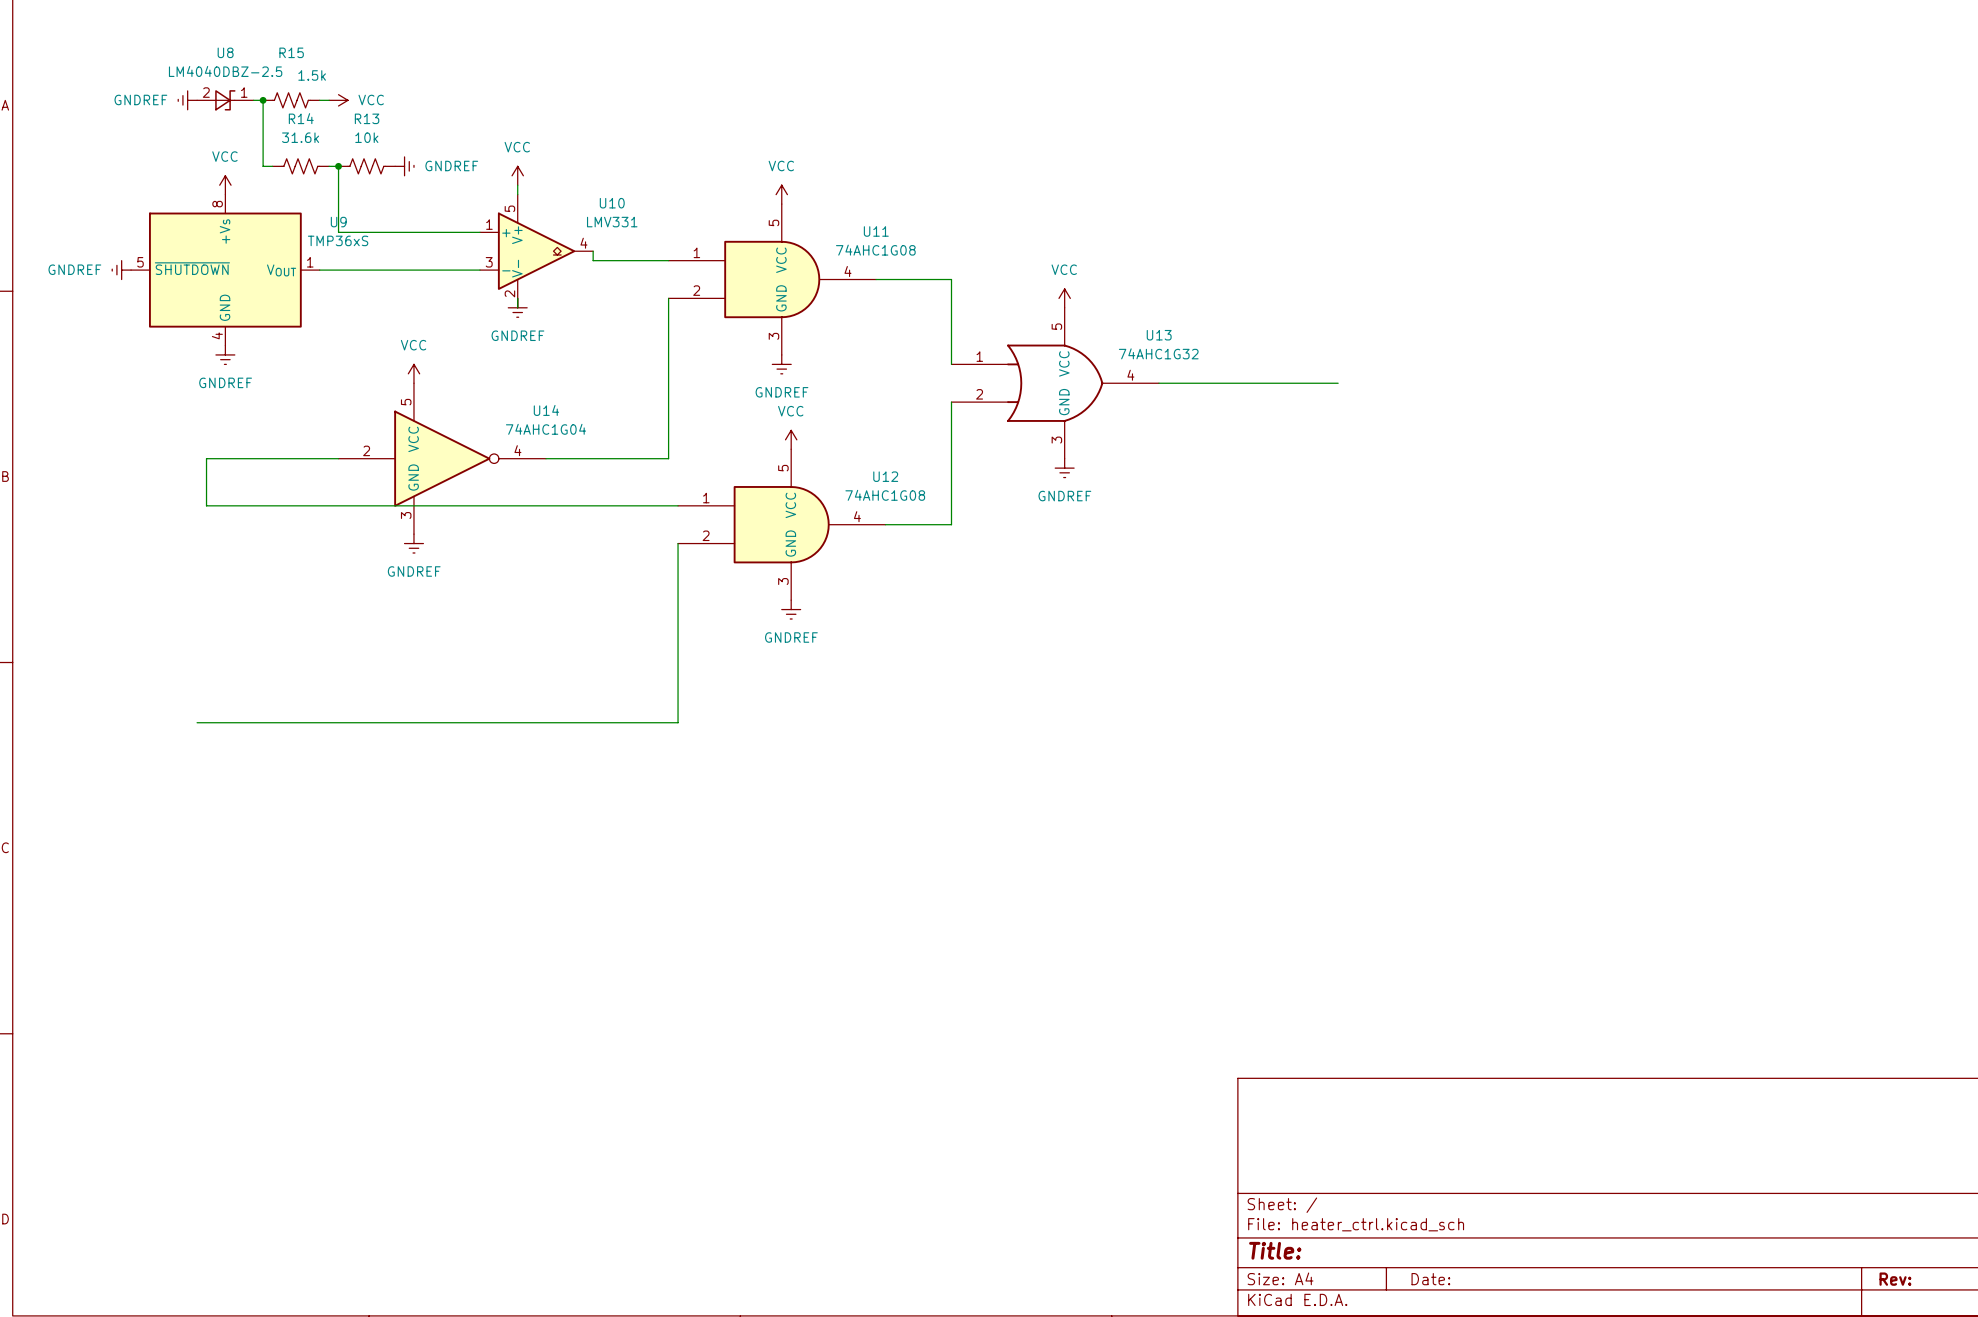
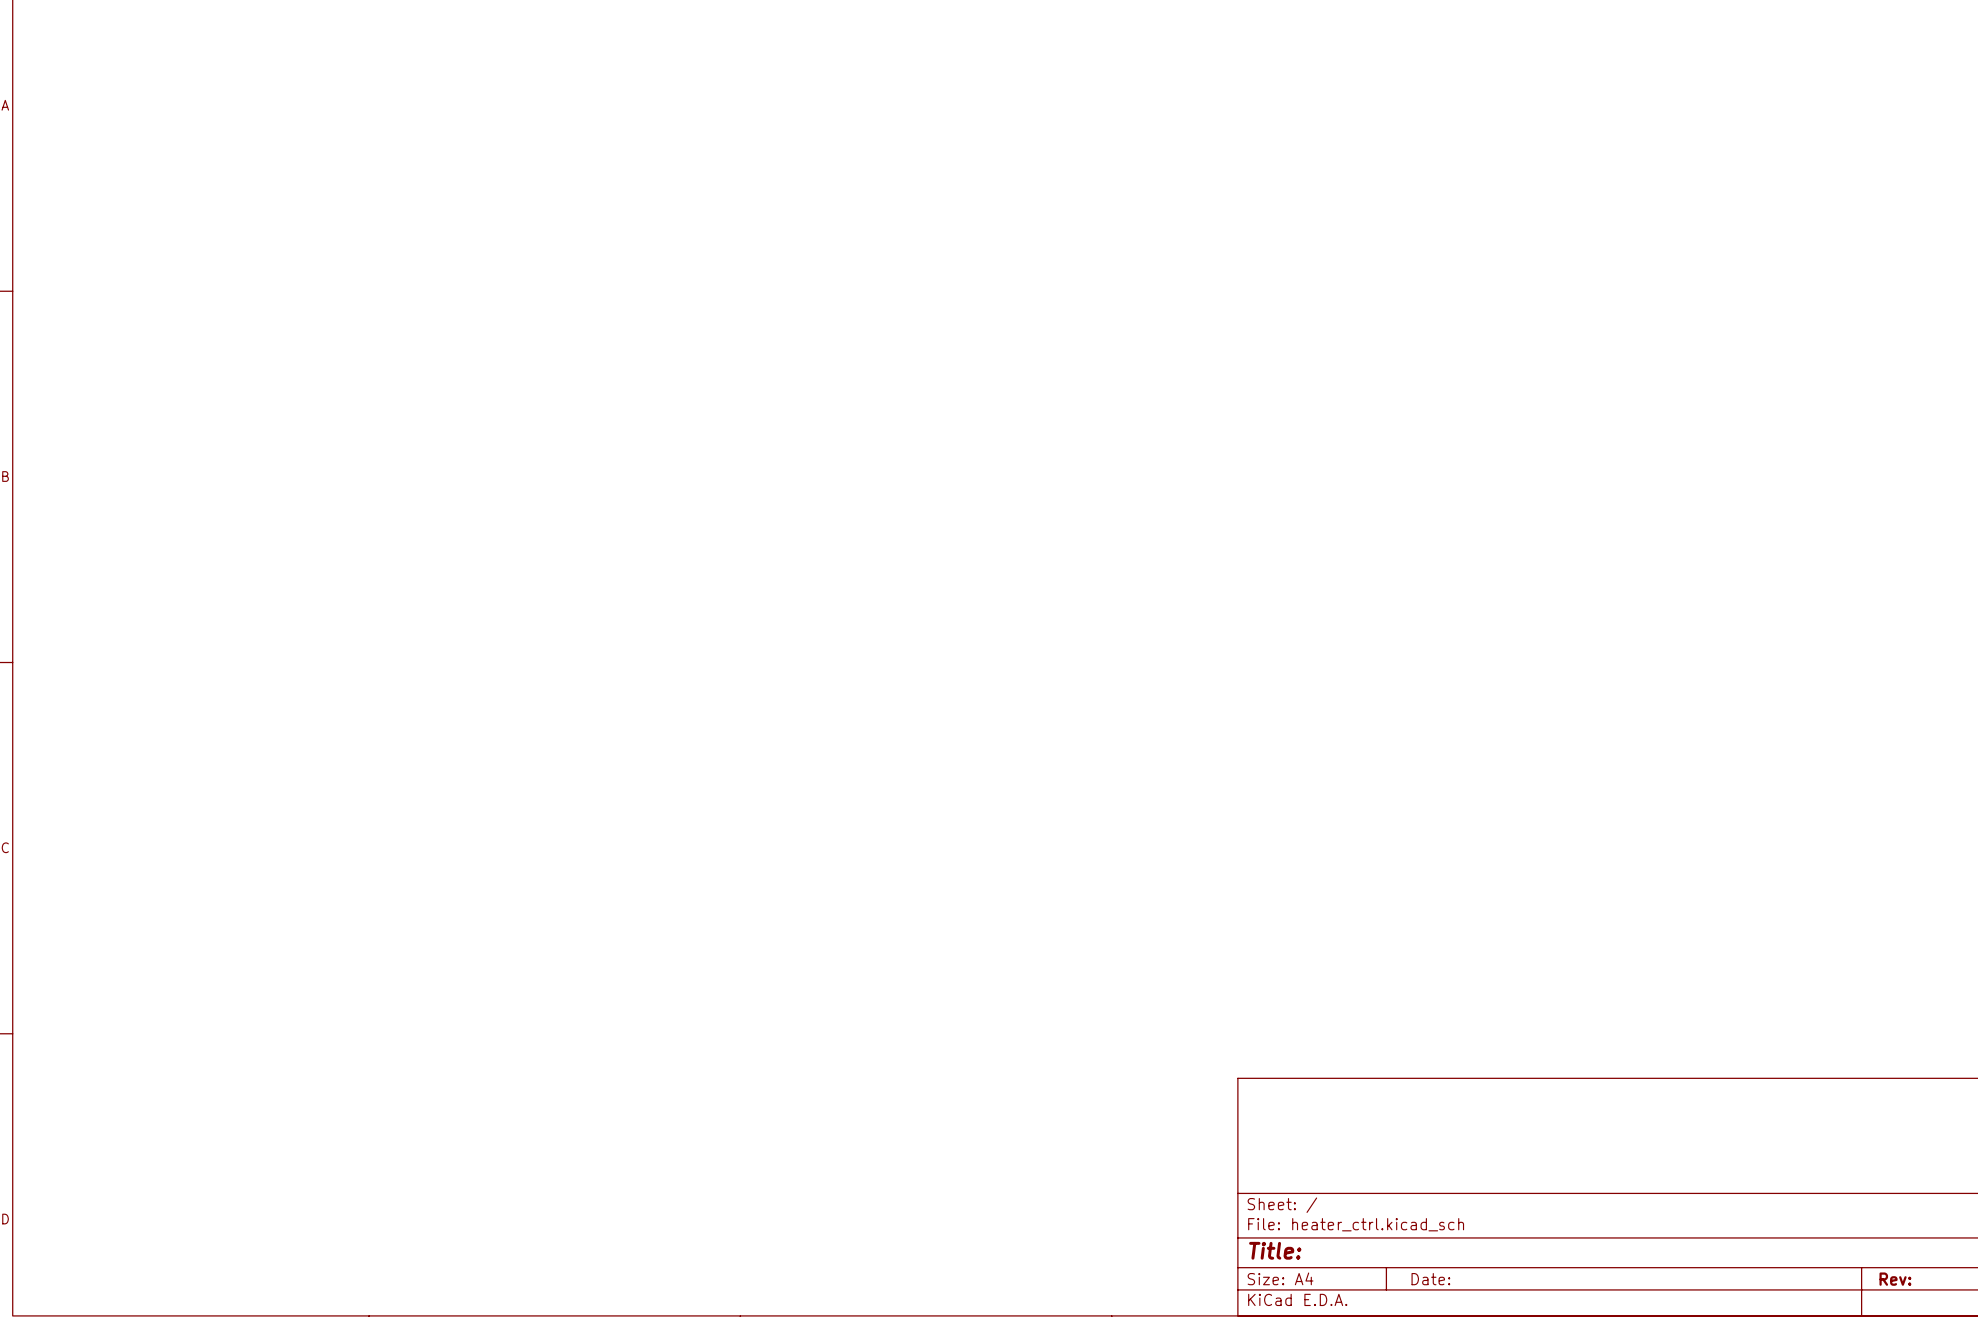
power symbol: GNDREF (187, 100) -> none
U8: LM4040DBZ-2.5 (225, 100) -> none
wire: (253, 100) (263, 100) (263, 166) (272, 166) -> none
junction: (263, 100) -> none
R15: 1.5k (291, 100) -> none
wire: (319, 100) (329, 100) -> none
power symbol: VCC (338, 100) -> none
R14: 31.6k (300, 166) -> none
wire: (329, 166) (338, 166) (338, 232) (479, 232) -> none
junction: (338, 166) -> none
R13: 10k (366, 166) -> none
power symbol: GNDREF (404, 166) -> none
power symbol: VCC (517, 175) -> none
power symbol: VCC (225, 185) -> none
wire: (517, 185) (517, 194) -> none
power symbol: VCC (781, 194) -> none
U10: LMV331 (536, 251) -> none
wire: (593, 251) (593, 260) (668, 260) -> none
power symbol: GNDREF (121, 270) -> none
U9: TMP36xS (225, 270) -> none
wire: (319, 270) (479, 270) -> none
U11: 74AHC1G08 (772, 279) -> none
wire: (876, 279) (951, 279) (951, 364) -> none
wire: (517, 298) (517, 307) -> none
wire: (668, 298) (668, 458) (546, 458) -> none
power symbol: VCC (1064, 298) -> none
power symbol: GNDREF (517, 307) -> none
power symbol: GNDREF (225, 354) -> none
power symbol: GNDREF (781, 364) -> none
power symbol: VCC (413, 373) -> none
U13: 74AHC1G32 (1055, 383) -> none
wire: (1158, 383) (1338, 383) -> none
wire: (951, 402) (951, 524) (885, 524) -> none
power symbol: VCC (791, 439) -> none
wire: (338, 458) (206, 458) (206, 505) (678, 505) -> none
U14: 74AHC1G04 (442, 458) -> none
power symbol: GNDREF (1064, 468) -> none
U12: 74AHC1G08 (781, 524) -> none
power symbol: GNDREF (413, 543) -> none
wire: (678, 543) (678, 722) (197, 722) -> none
power symbol: GNDREF (791, 609) -> none

